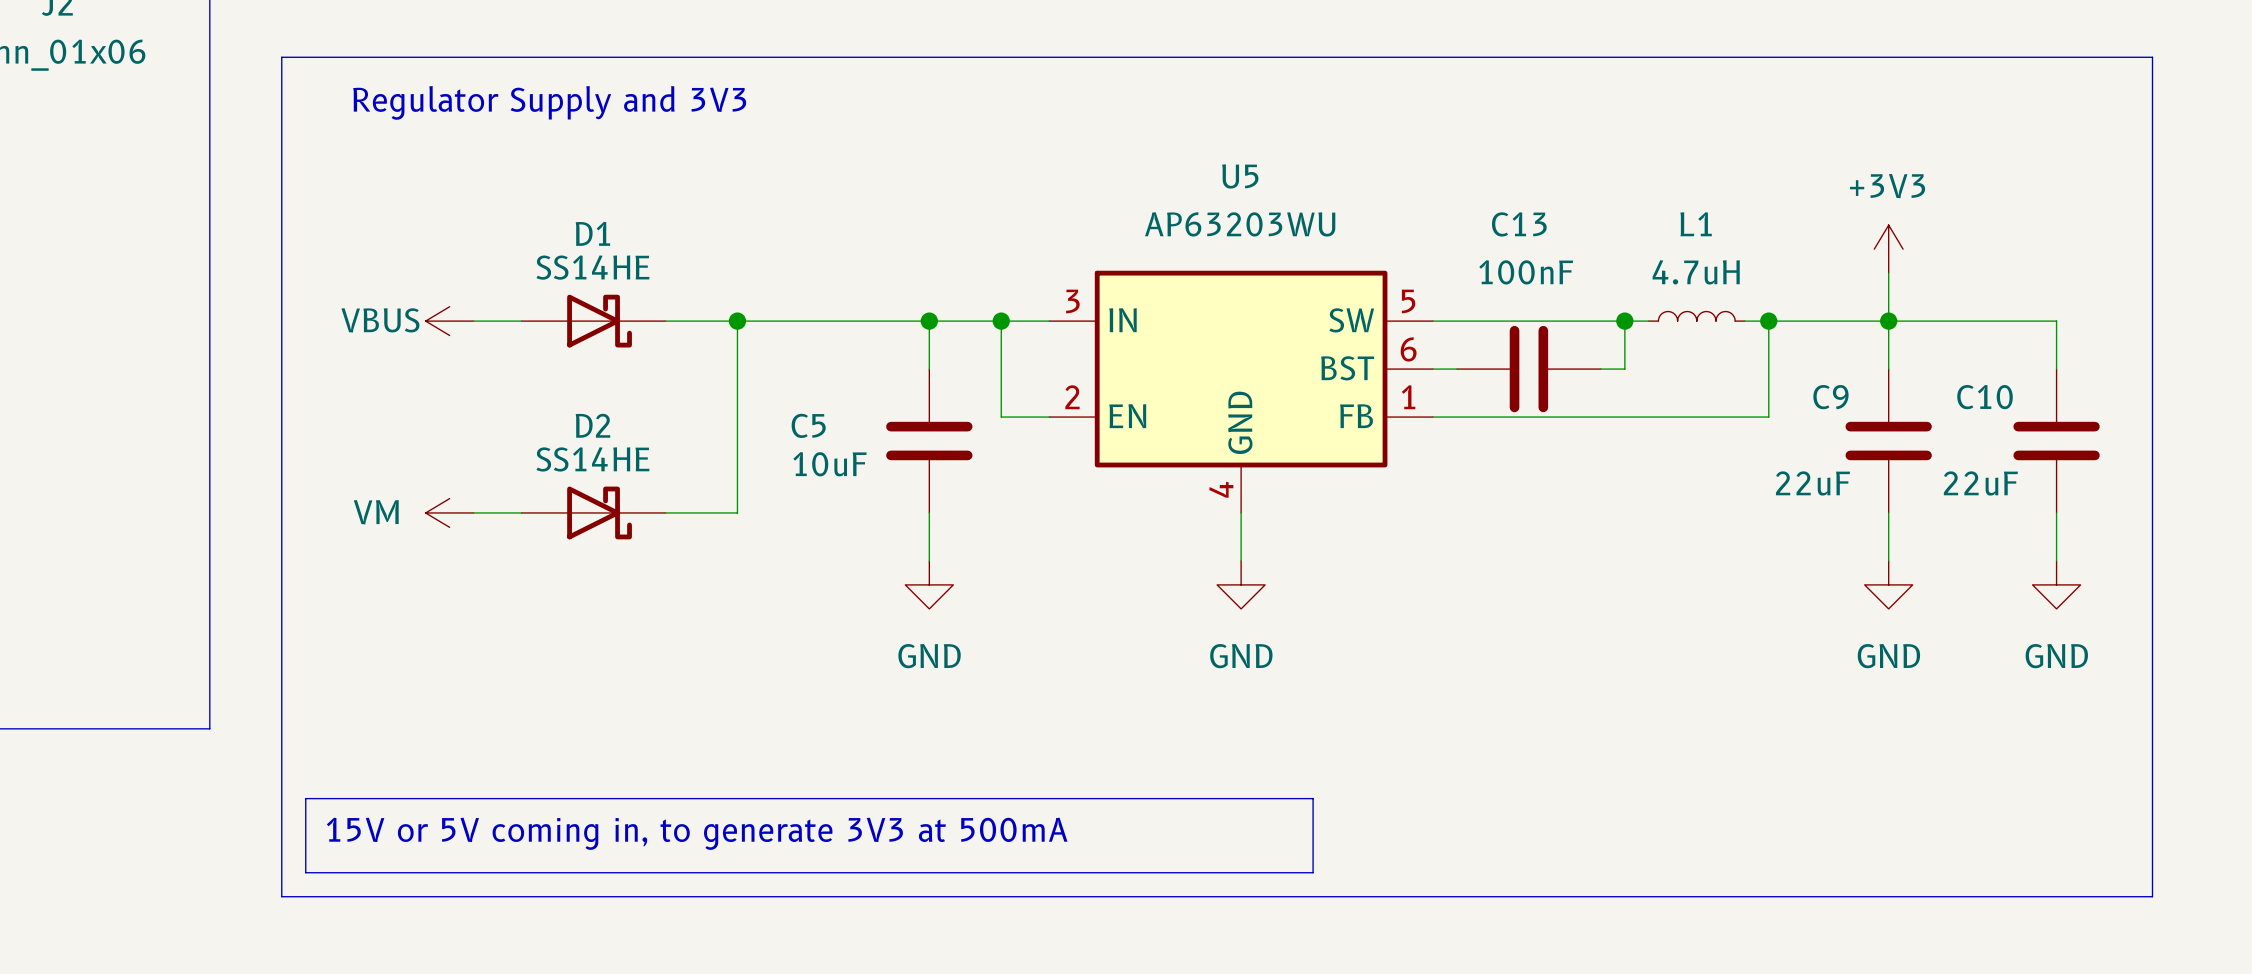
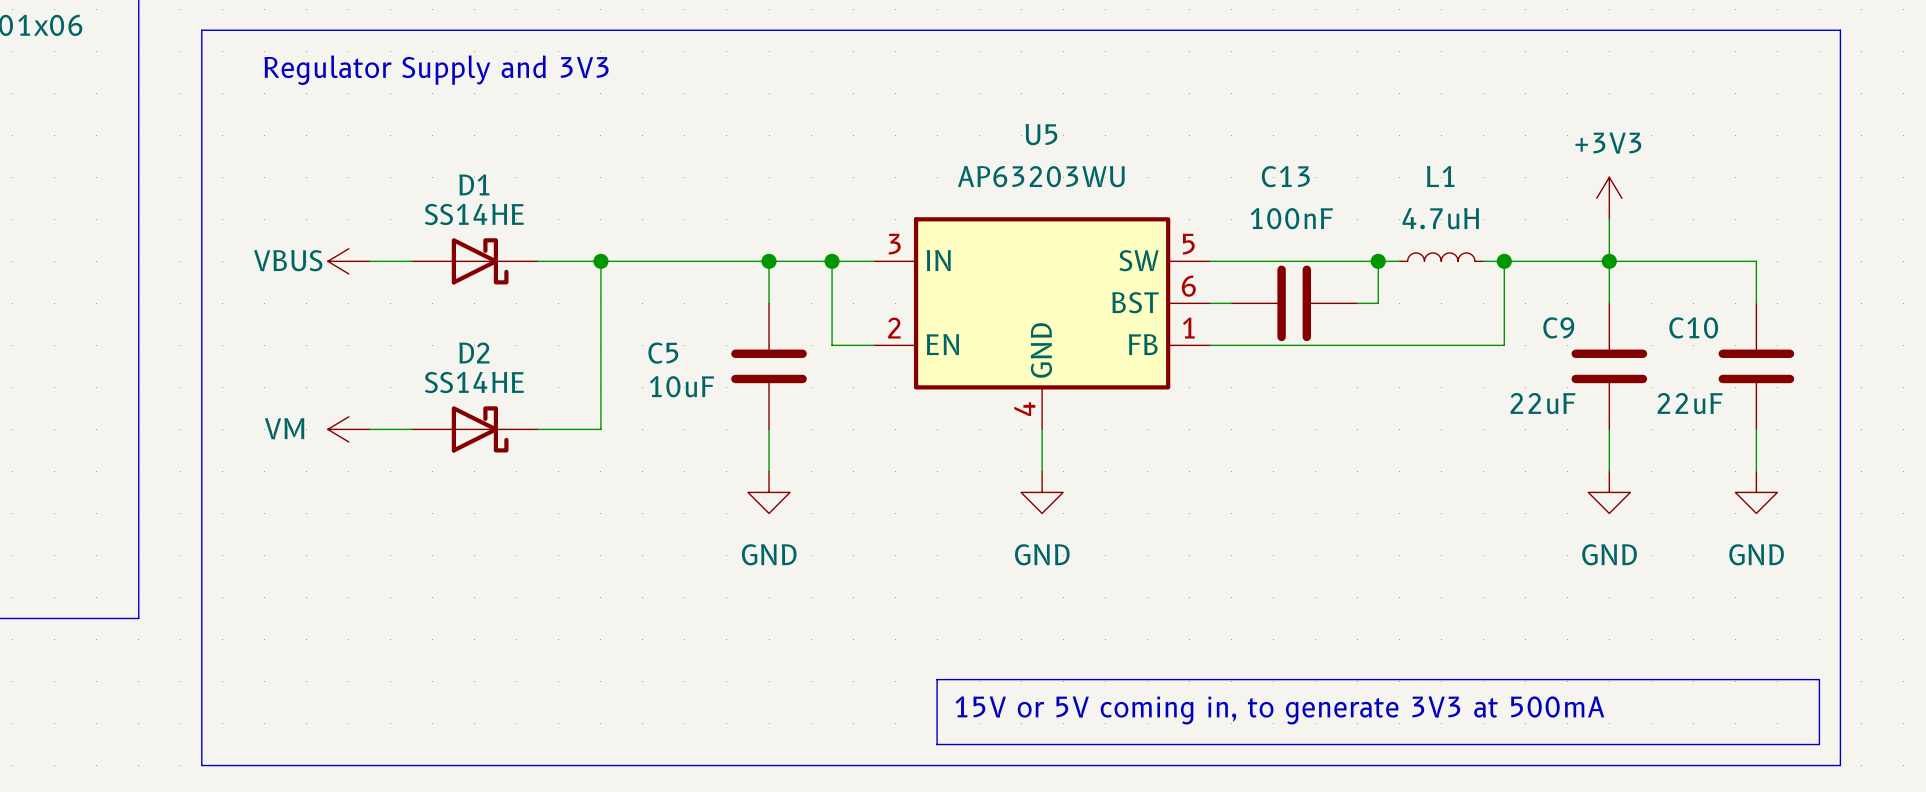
line: (1121, 798) (305, 798) (305, 872) (1121, 872) -> (937, 679) (937, 744)
line: (1313, 798) (1313, 872) -> (1105, 679) (1819, 679) (1819, 744) (1105, 744)
text: 15V or 5V coming in, to generate 3V3 at 500mA (697, 833) -> none
text: none -> 15V or 5V coming in, to generate 3V3 at 500mA (1279, 710)

